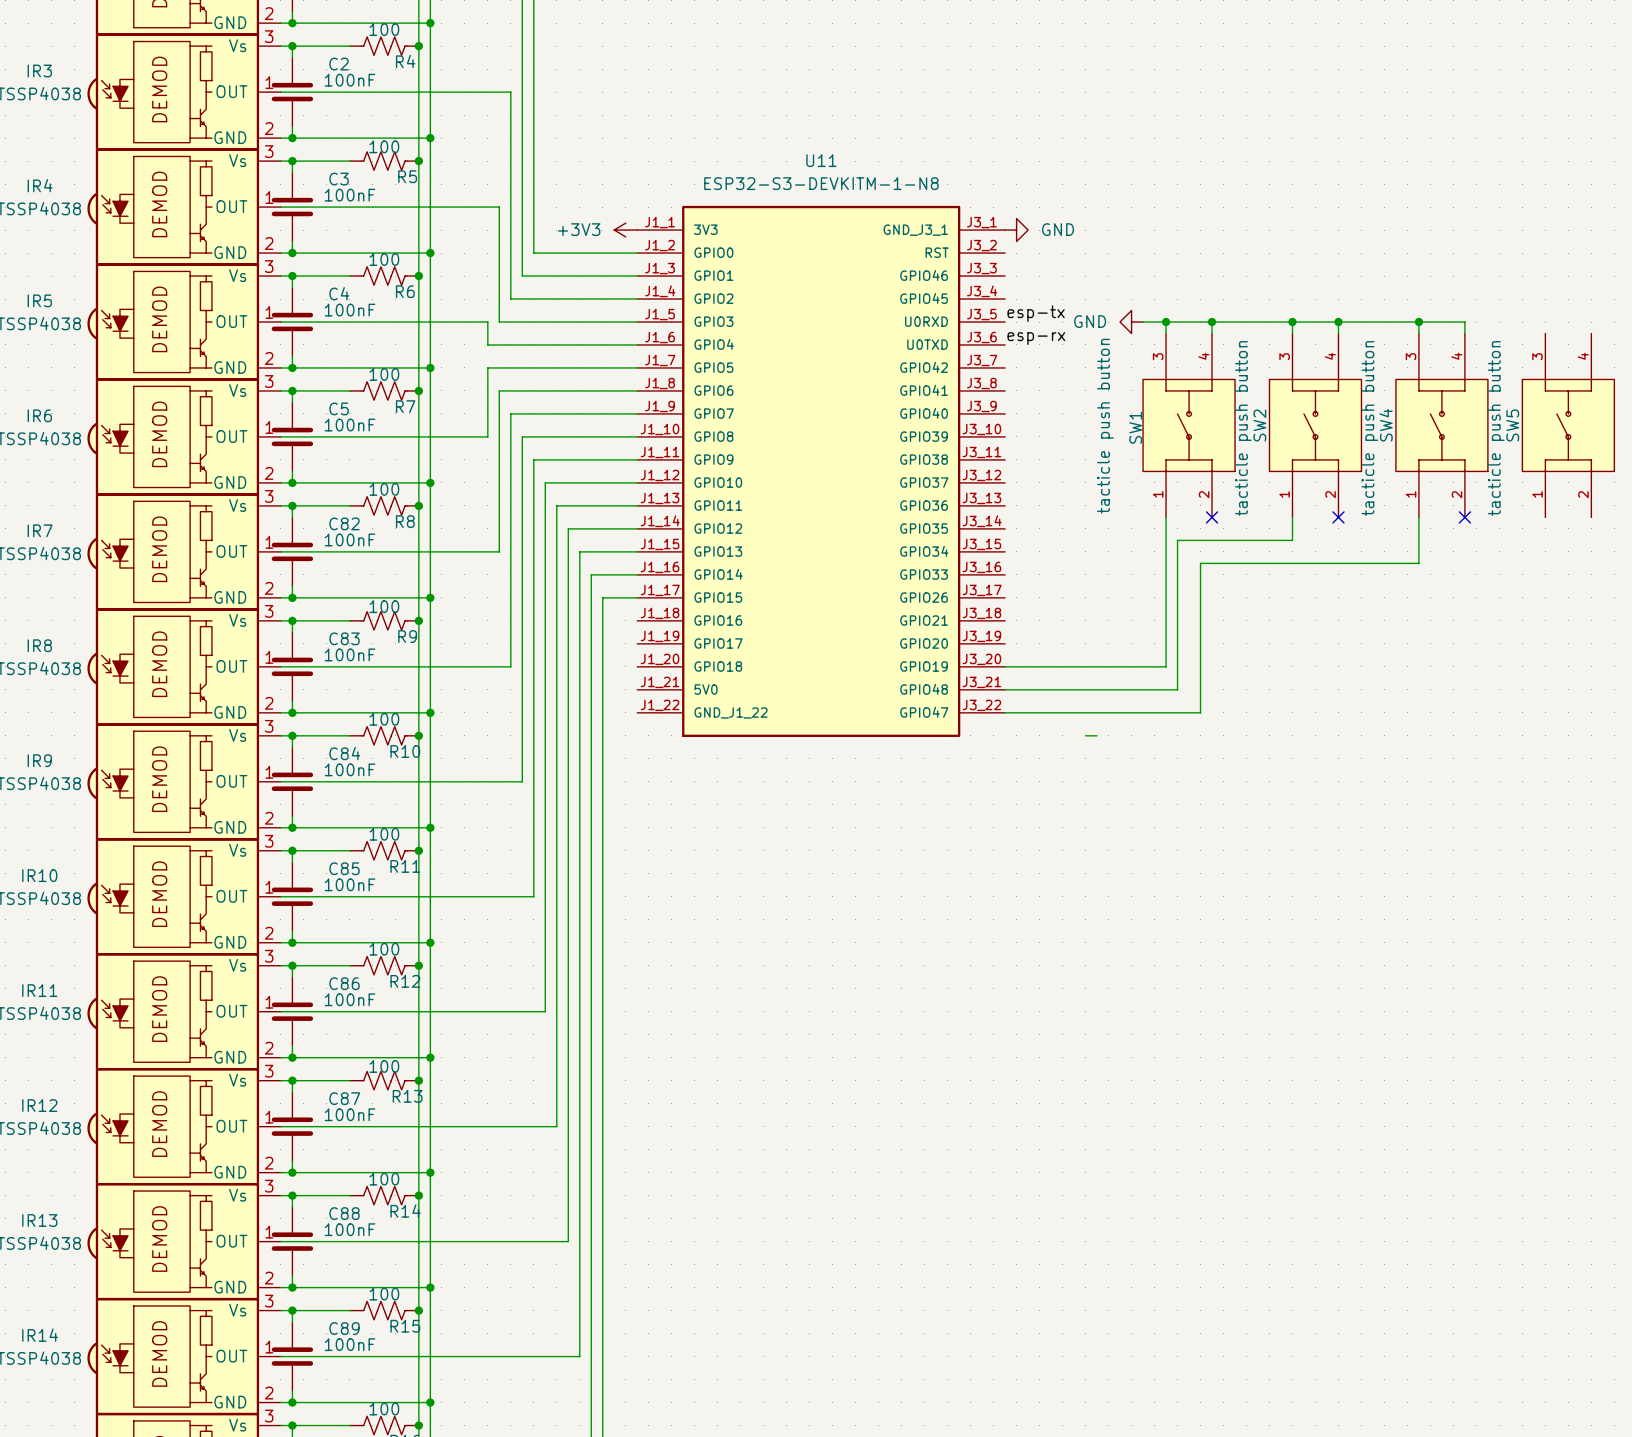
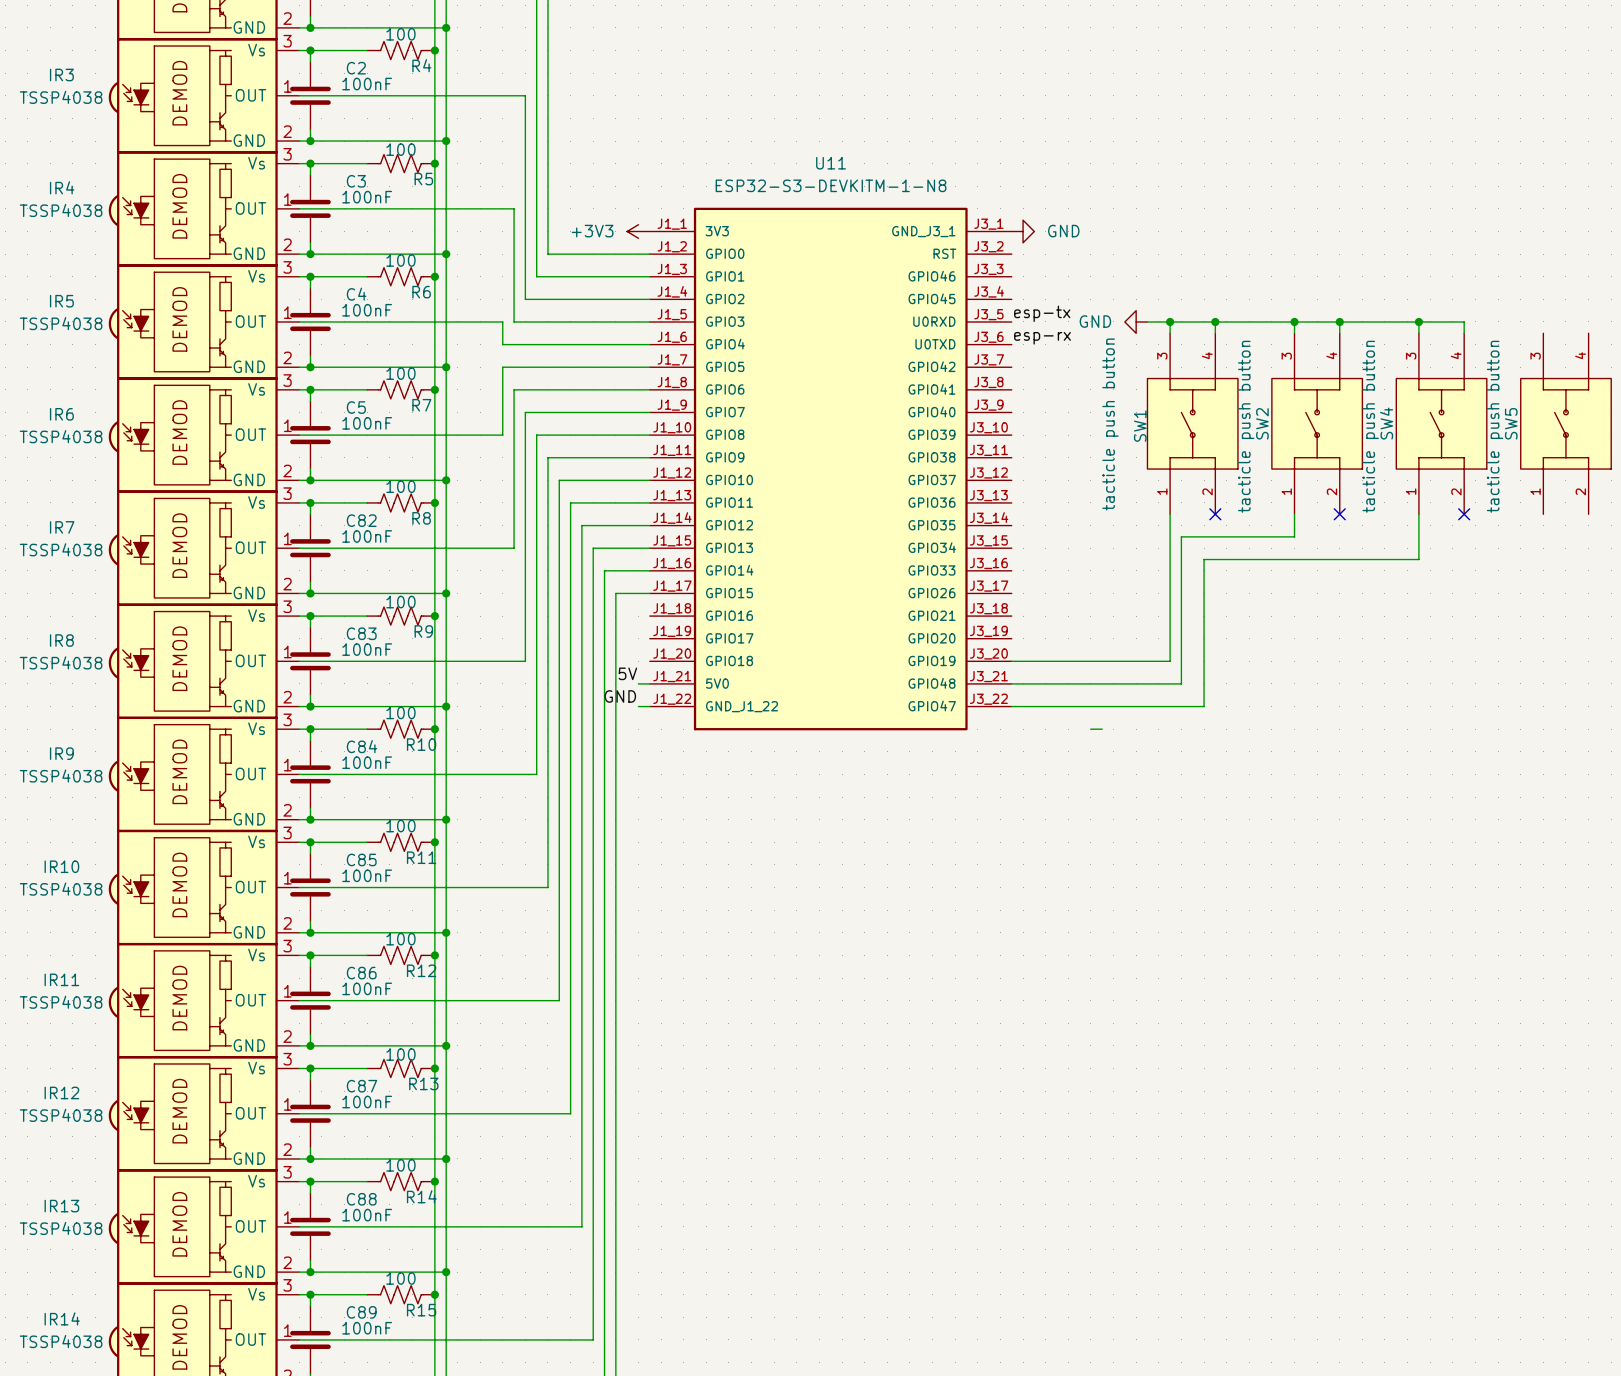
label: none -> 5V (627, 673)
wire: none -> (638, 683) (649, 683)
label: none -> GND (620, 696)
wire: none -> (638, 706) (649, 706)

